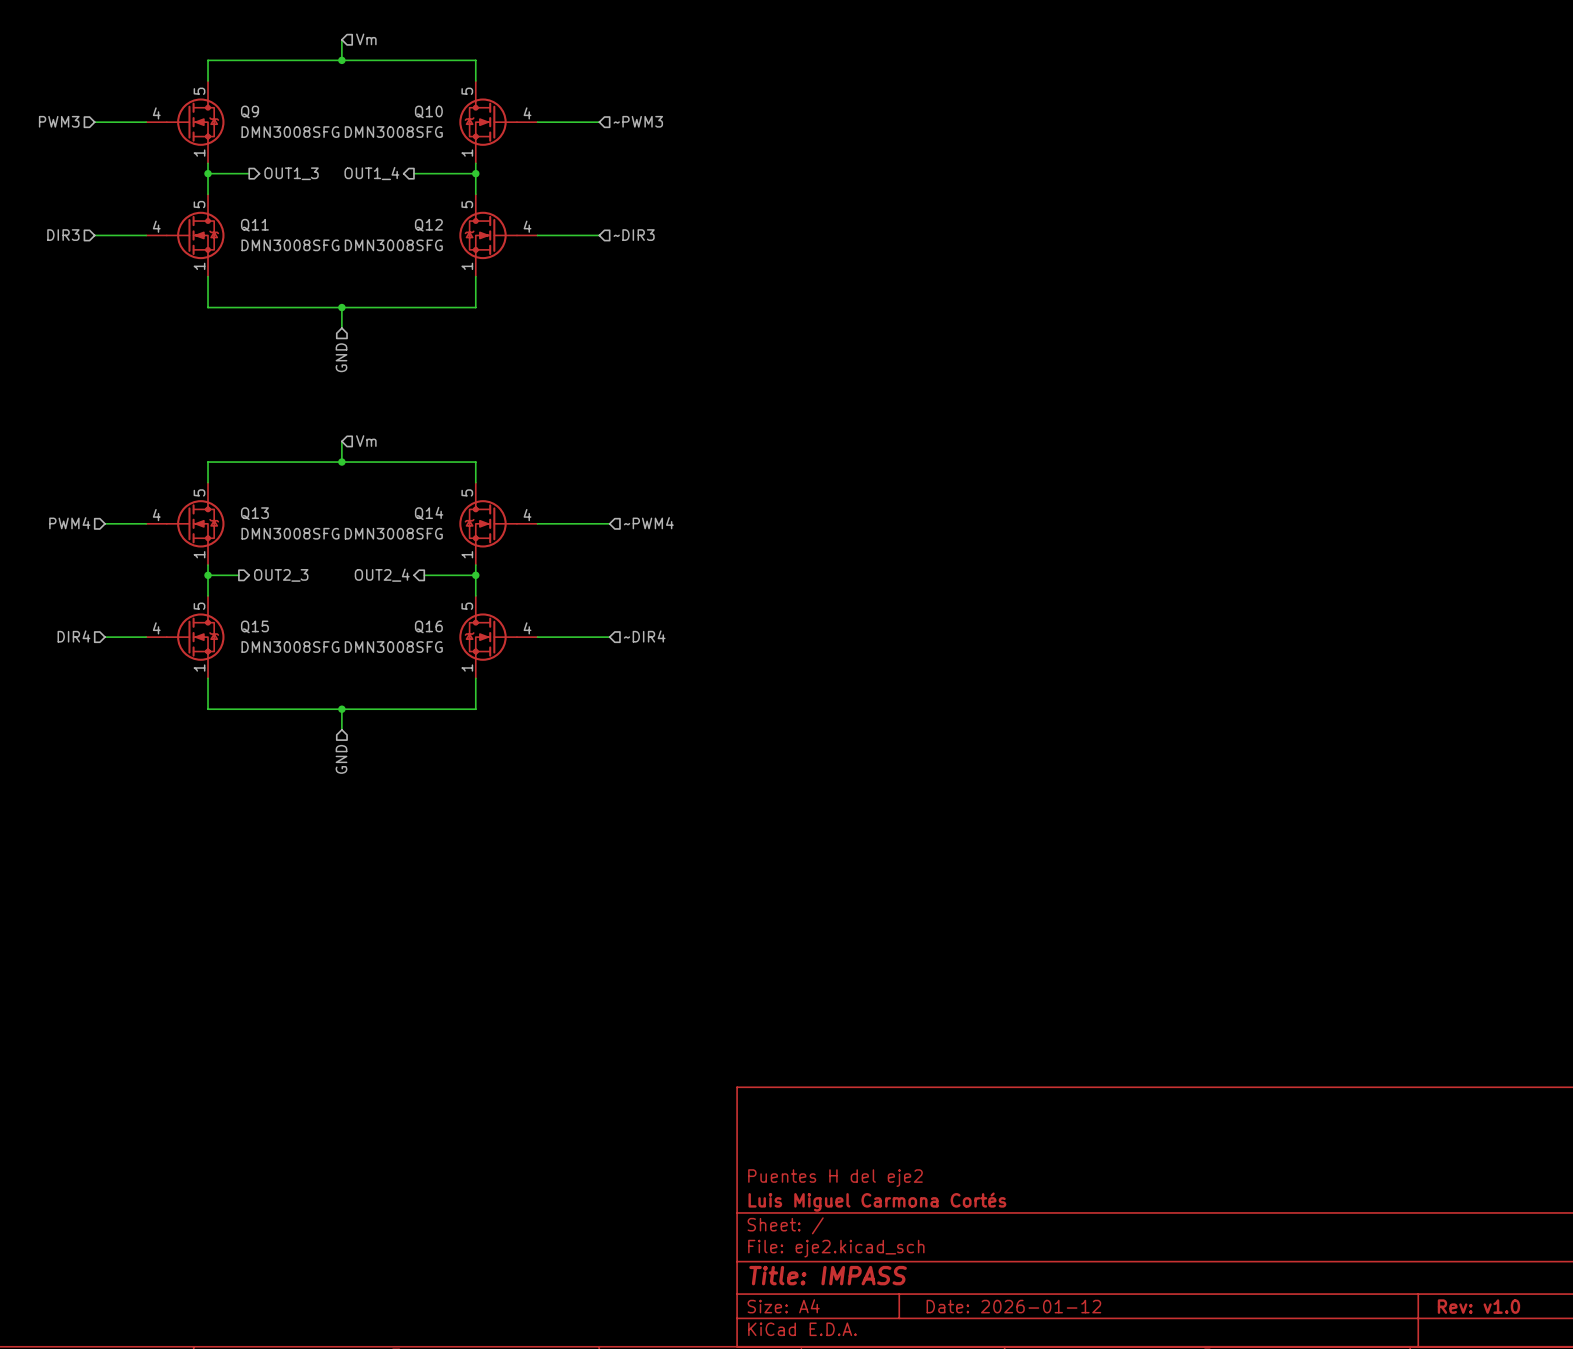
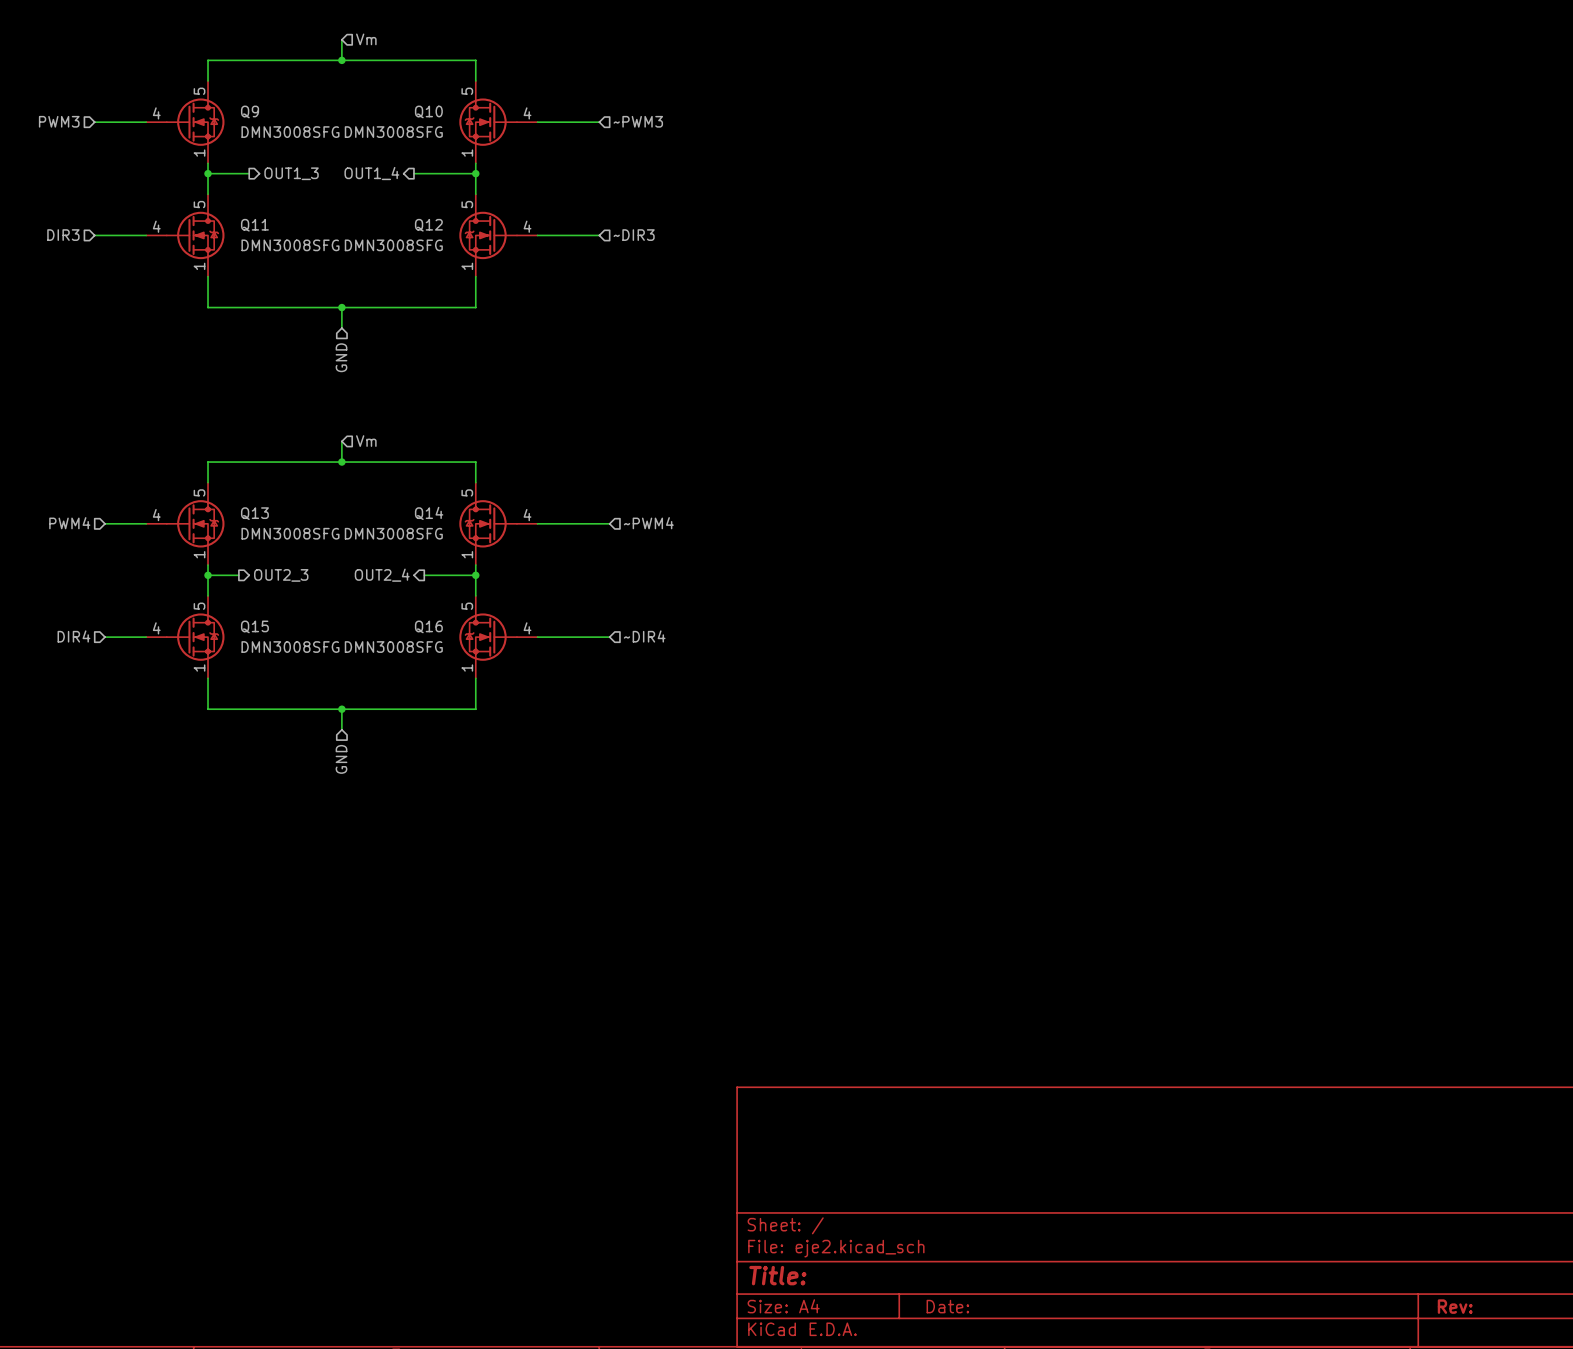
title block: Puentes H del eje2 (835, 1178) -> none
title block: Luis Miguel Carmona Cortés (877, 1202) -> none
title block: Title: IMPASS (828, 1275) -> Title: (777, 1275)
title block: Date: 2026-01-12 (1013, 1306) -> Date: (947, 1306)
title block: Rev: v1.0 (1478, 1306) -> Rev: (1455, 1306)

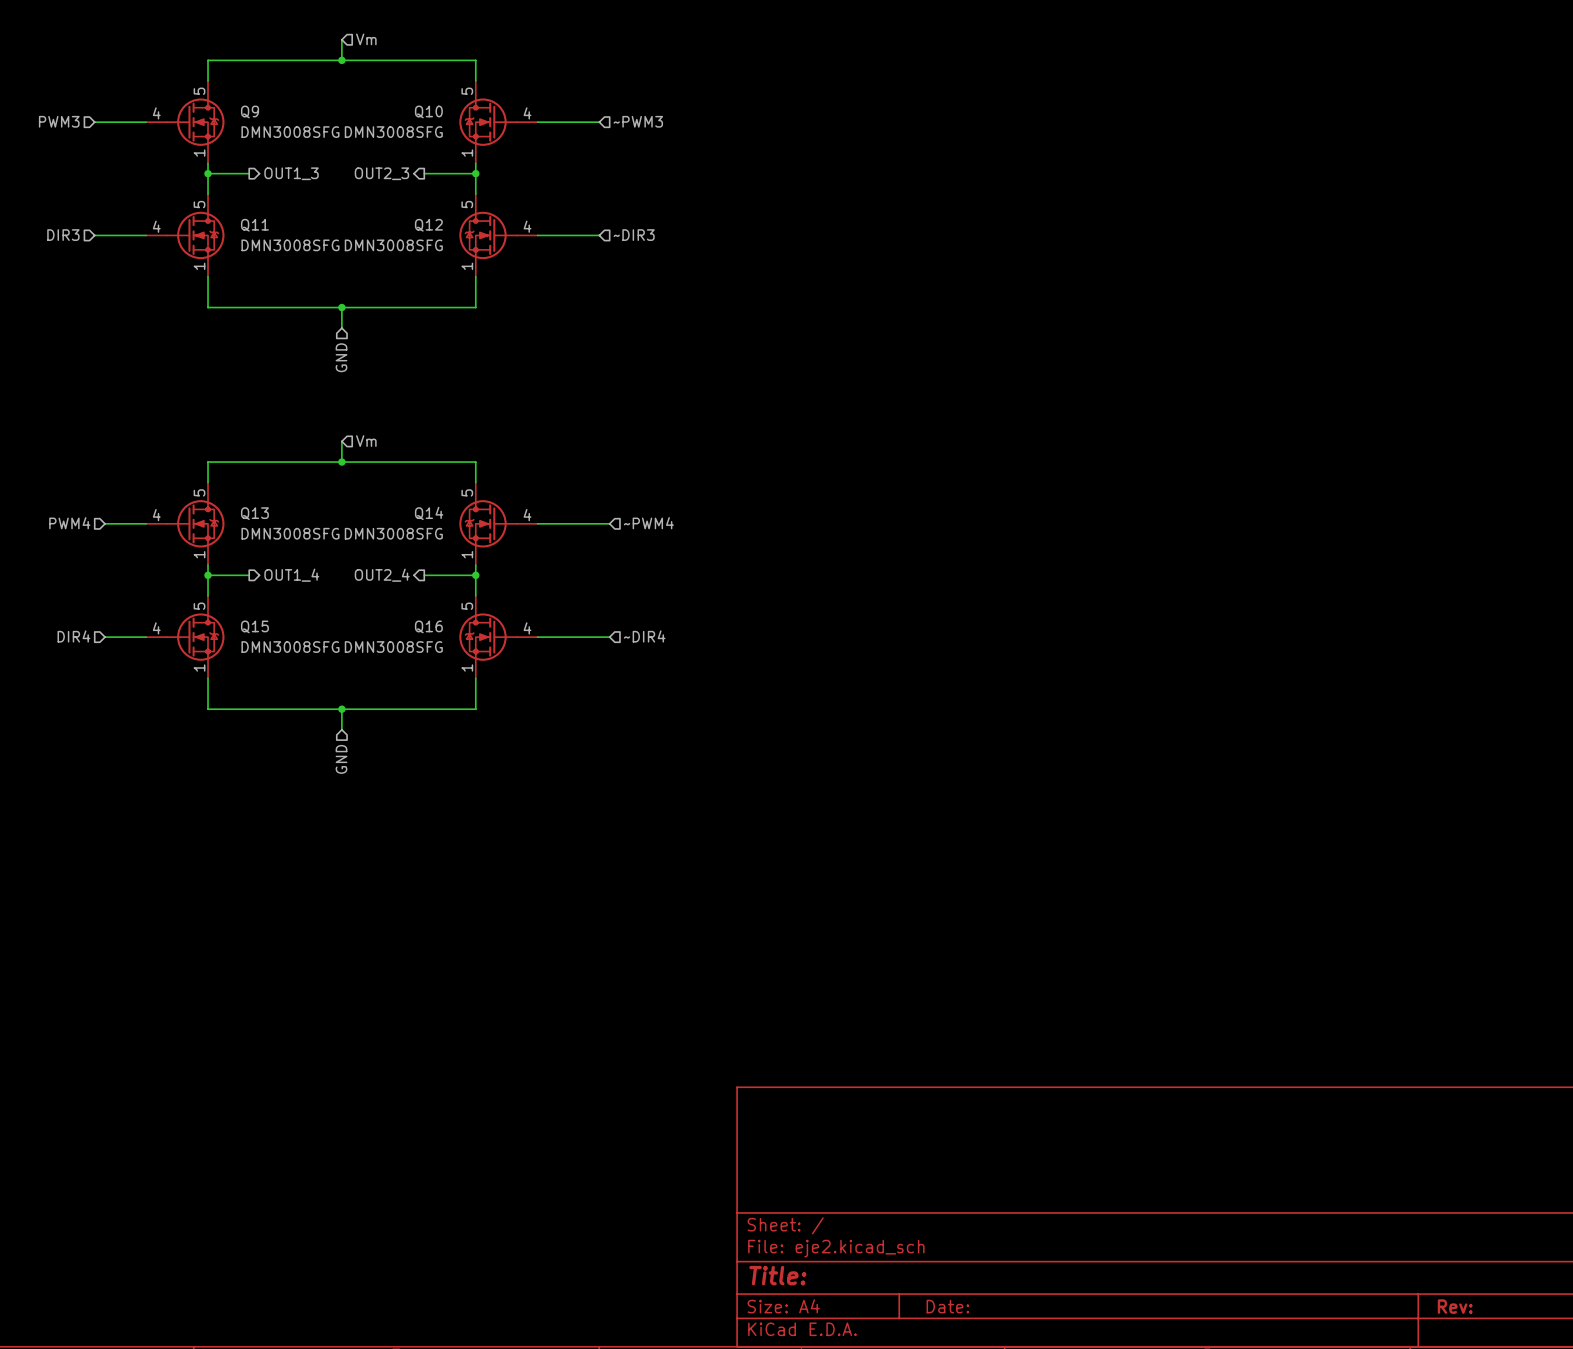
hierarchical label: OUT1_4 (371, 173) -> OUT2_3 (381, 173)
wire: (413, 173) (424, 173) -> none
wire: none -> (238, 575) (249, 575)
hierarchical label: OUT2_3 (281, 575) -> OUT1_4 (291, 575)

